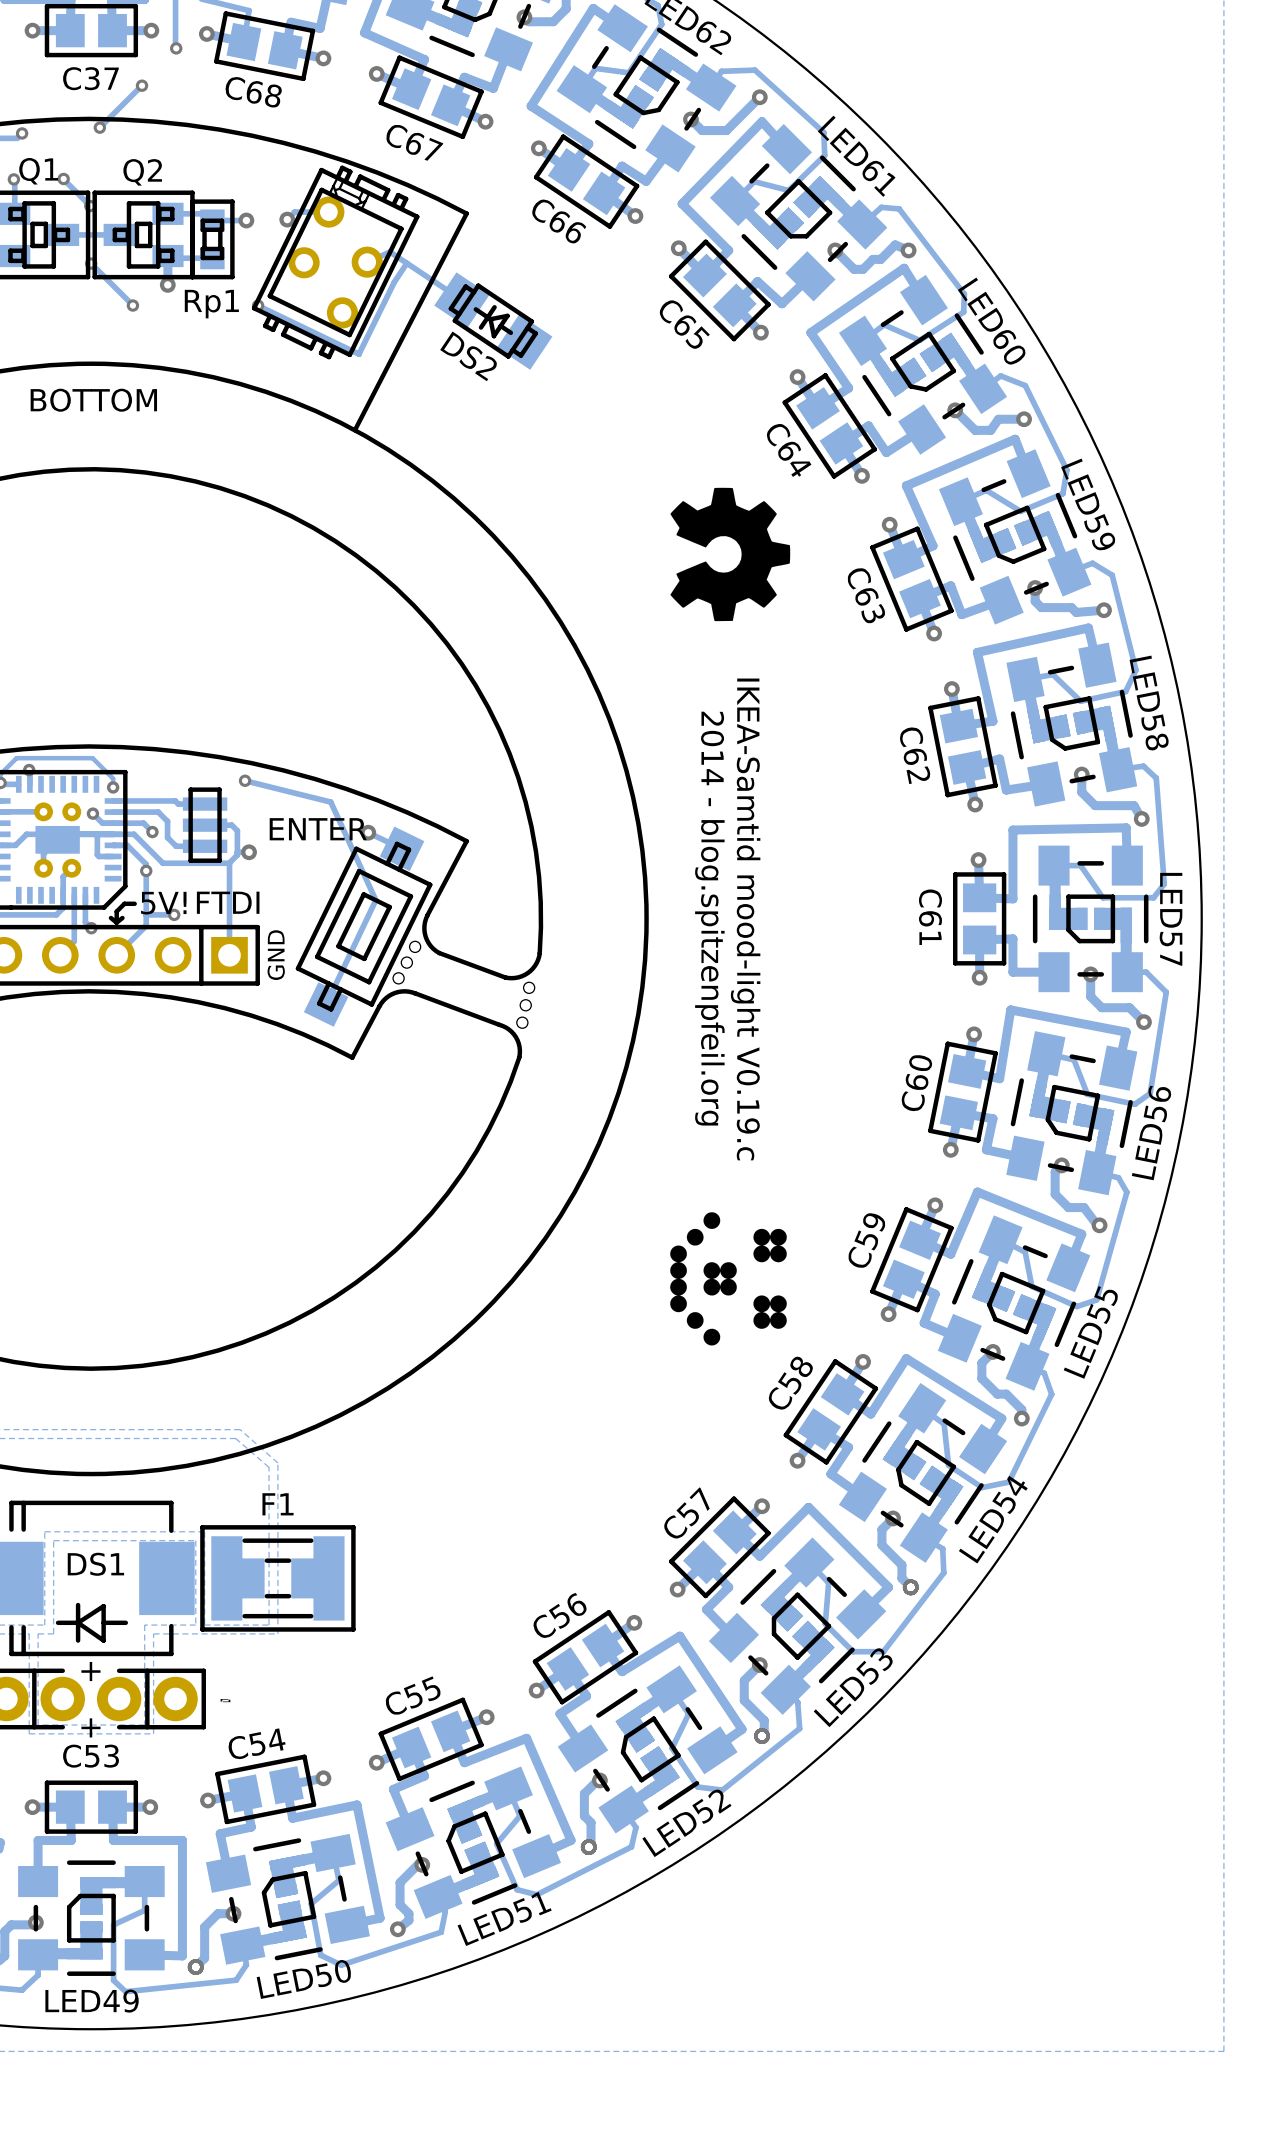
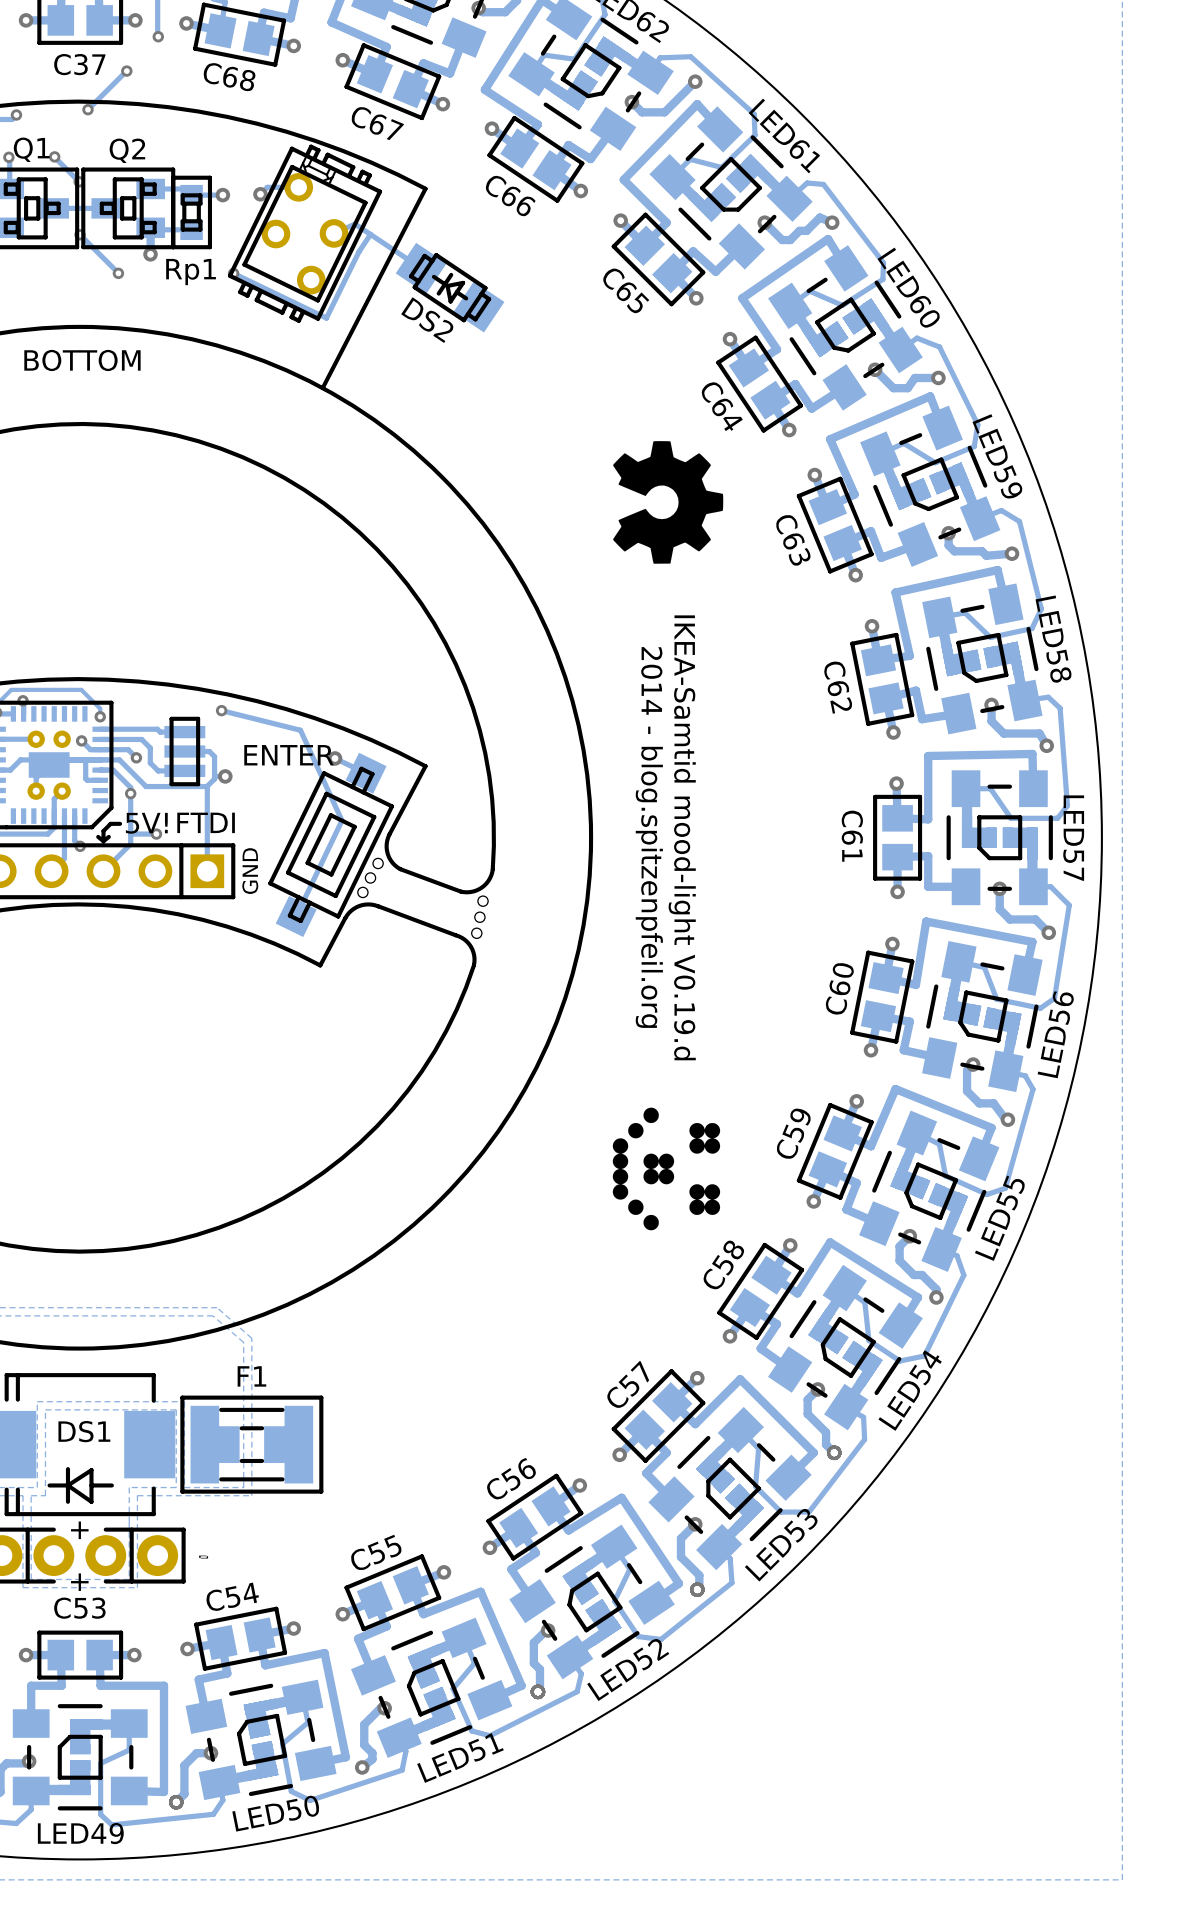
text: IKEA-Samtid mood-light V0.19.c (745, 919) -> IKEA-Samtid mood-light V0.19.d (682, 837)

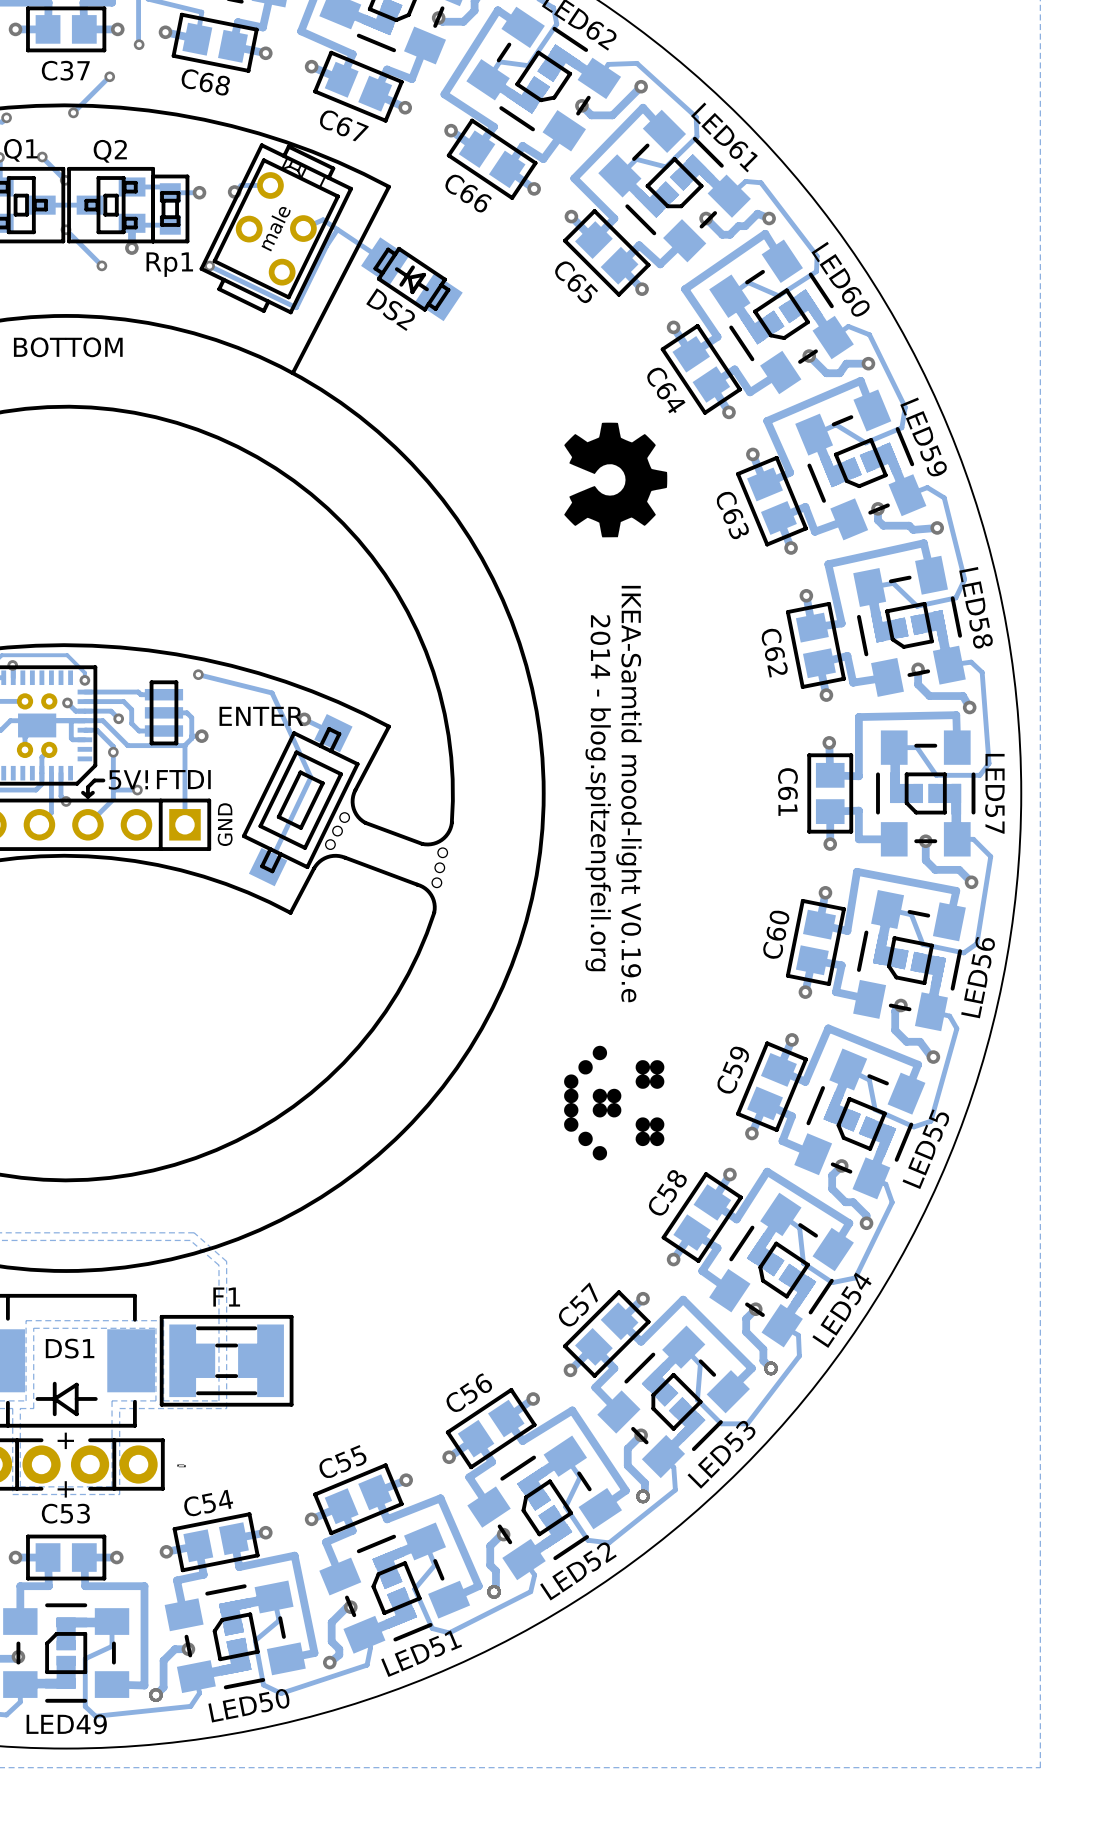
part footprint: [227, 144, 383, 323] -> [199, 143, 353, 315]
text: IKEA-Samtid mood-light V0.19.d (682, 837) -> IKEA-Samtid mood-light V0.19.e (628, 794)

